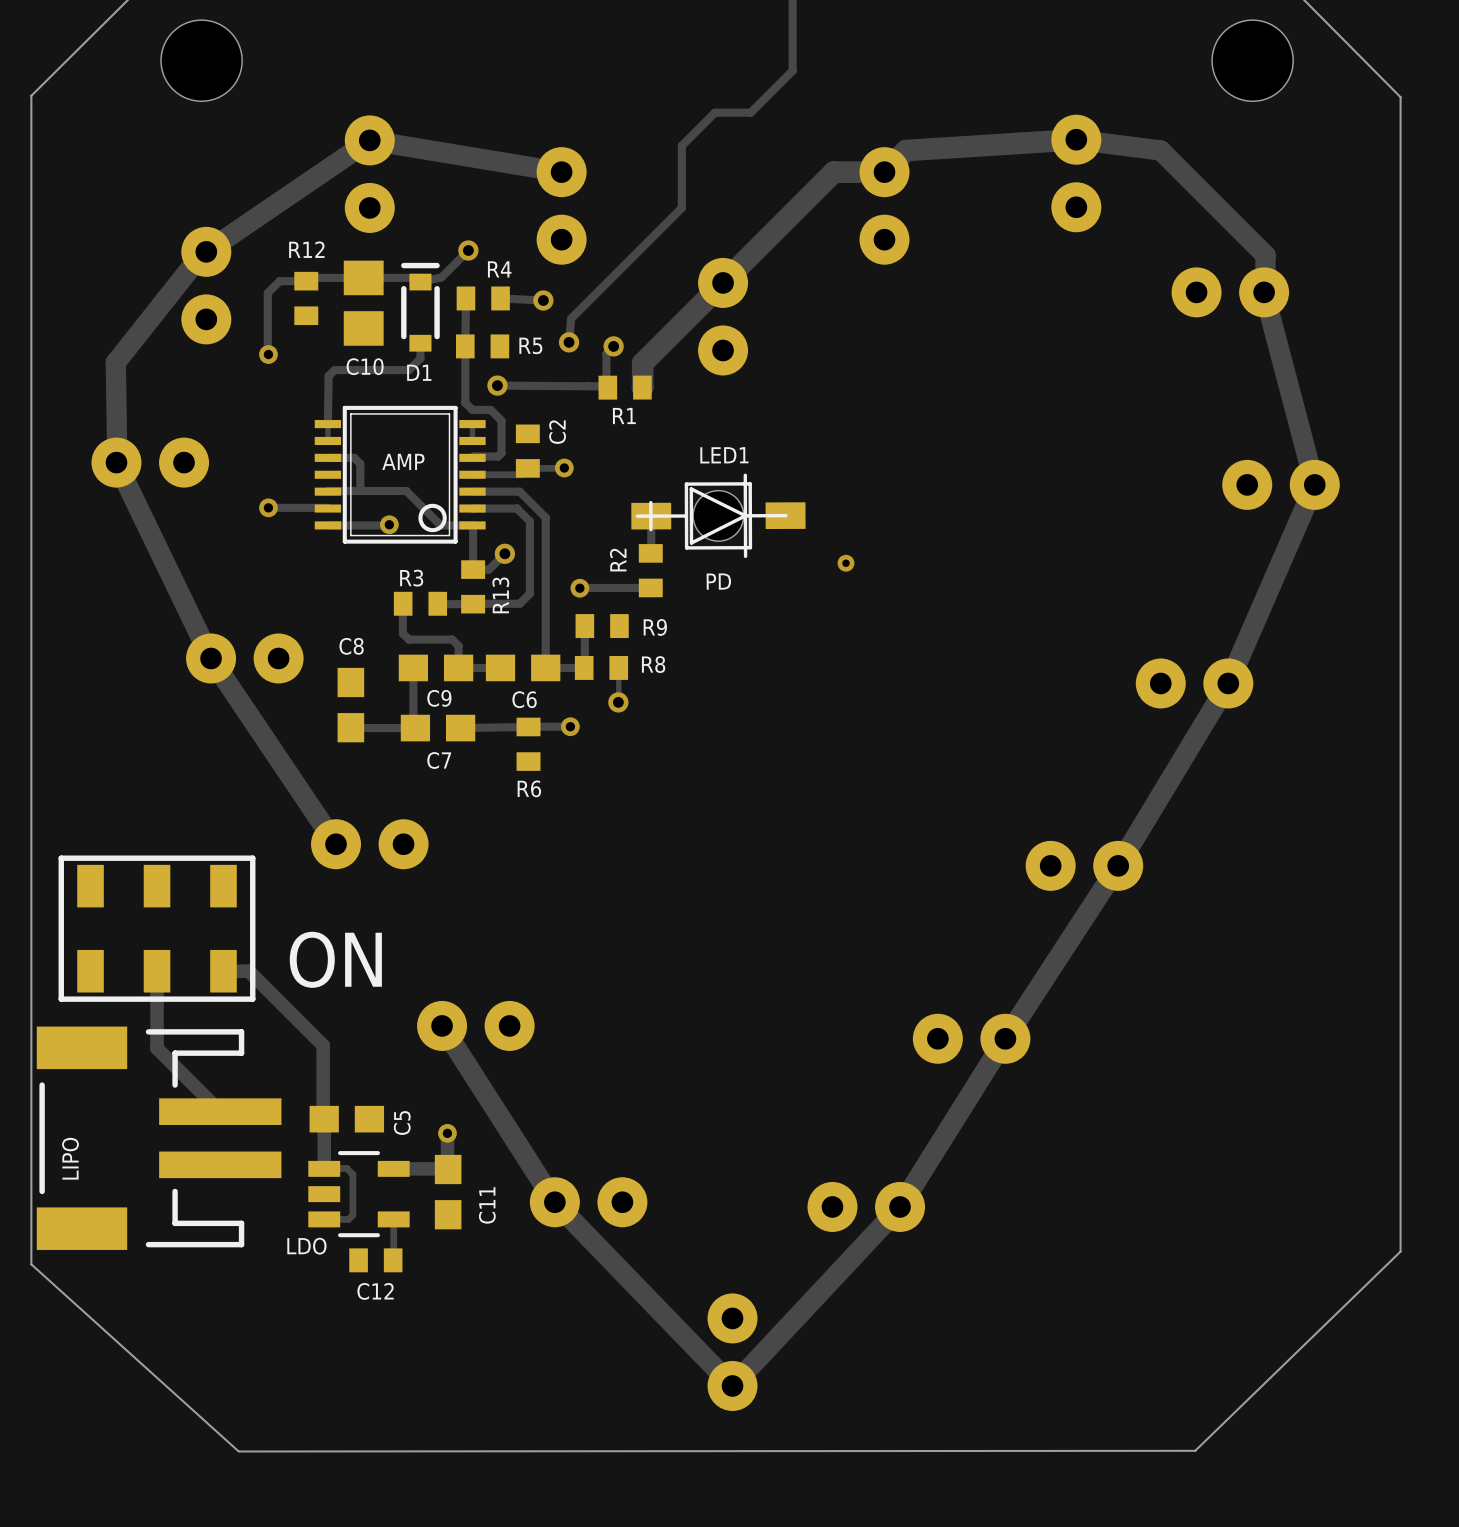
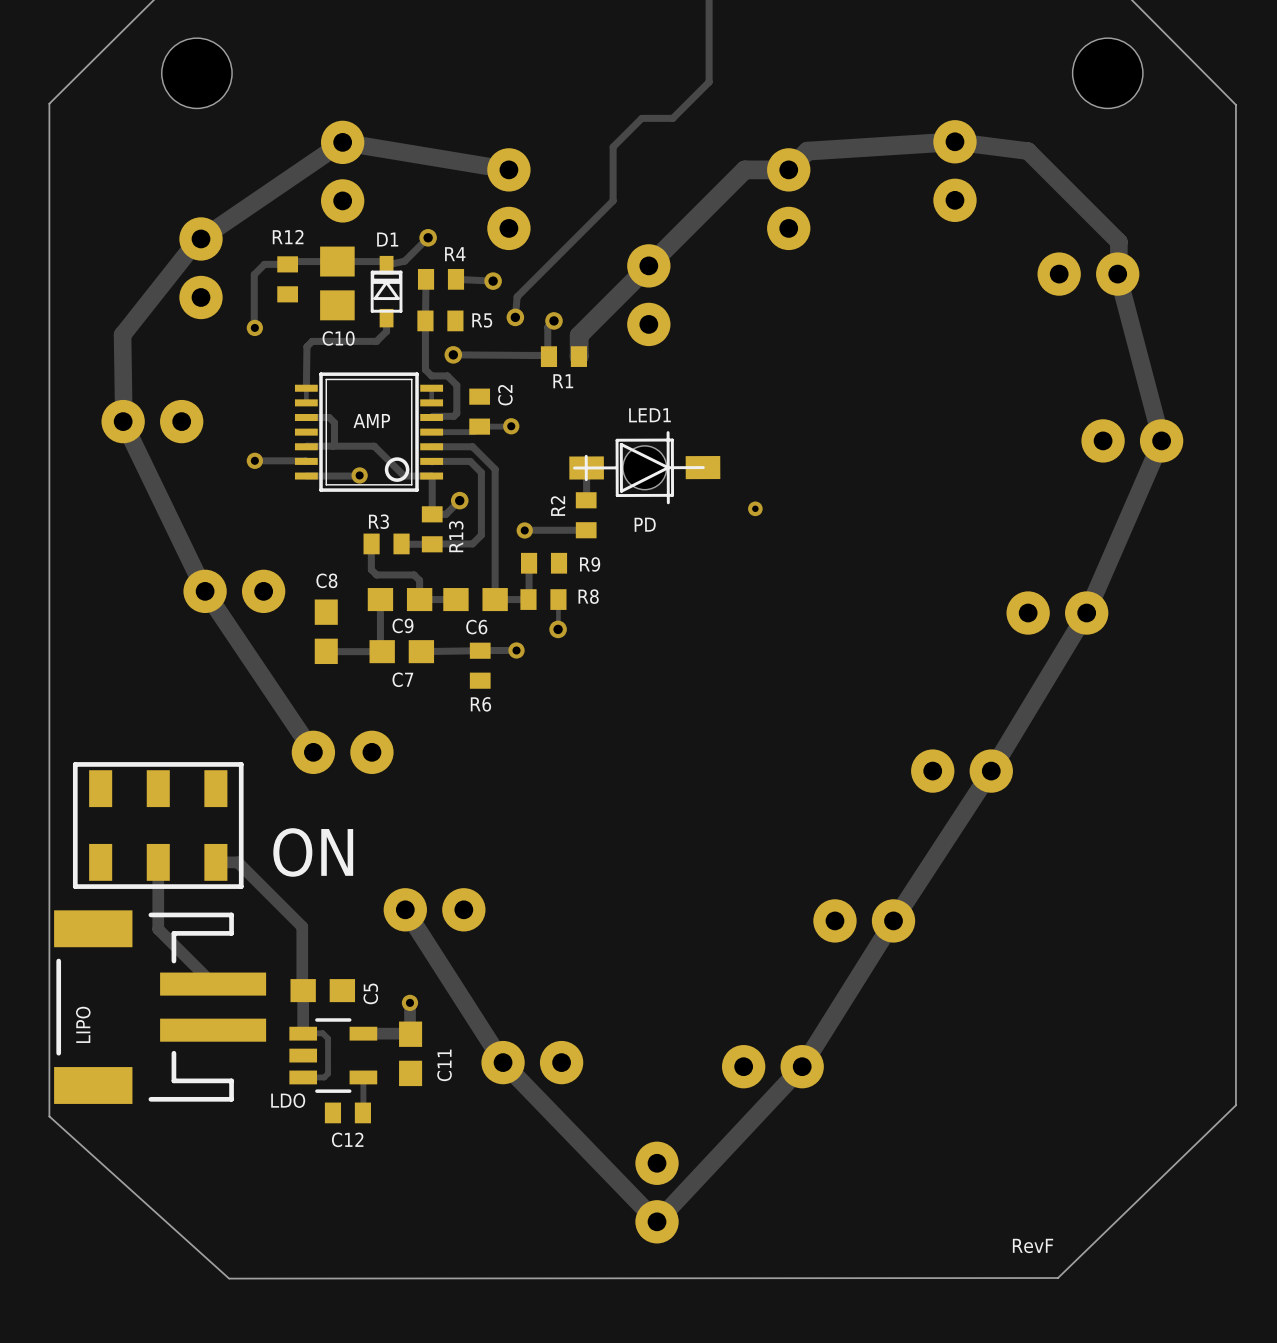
D1 footprint: [401, 262, 440, 352] -> [370, 255, 403, 328]
D1 name position: D1 (419, 372) -> D1 (387, 239)
drawing: none -> [1012, 1238, 1054, 1254]

